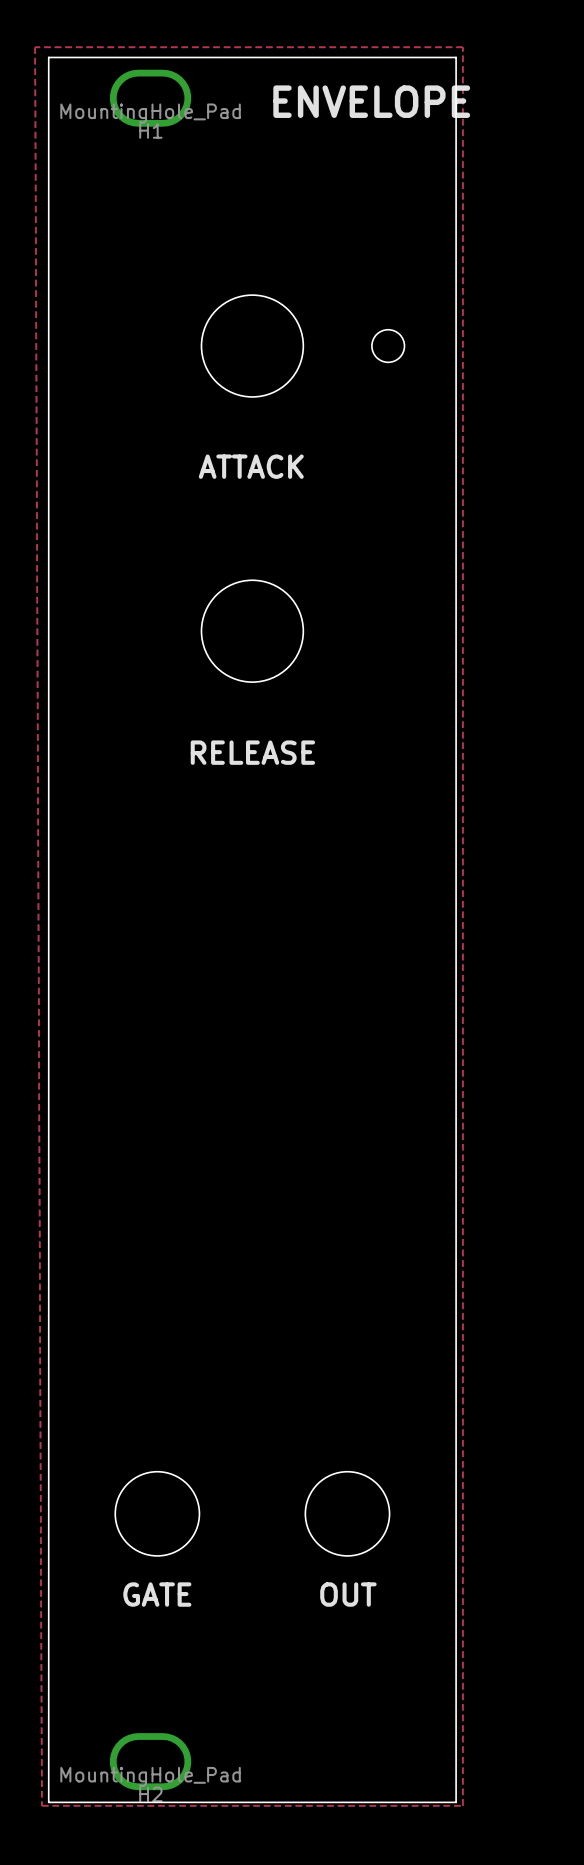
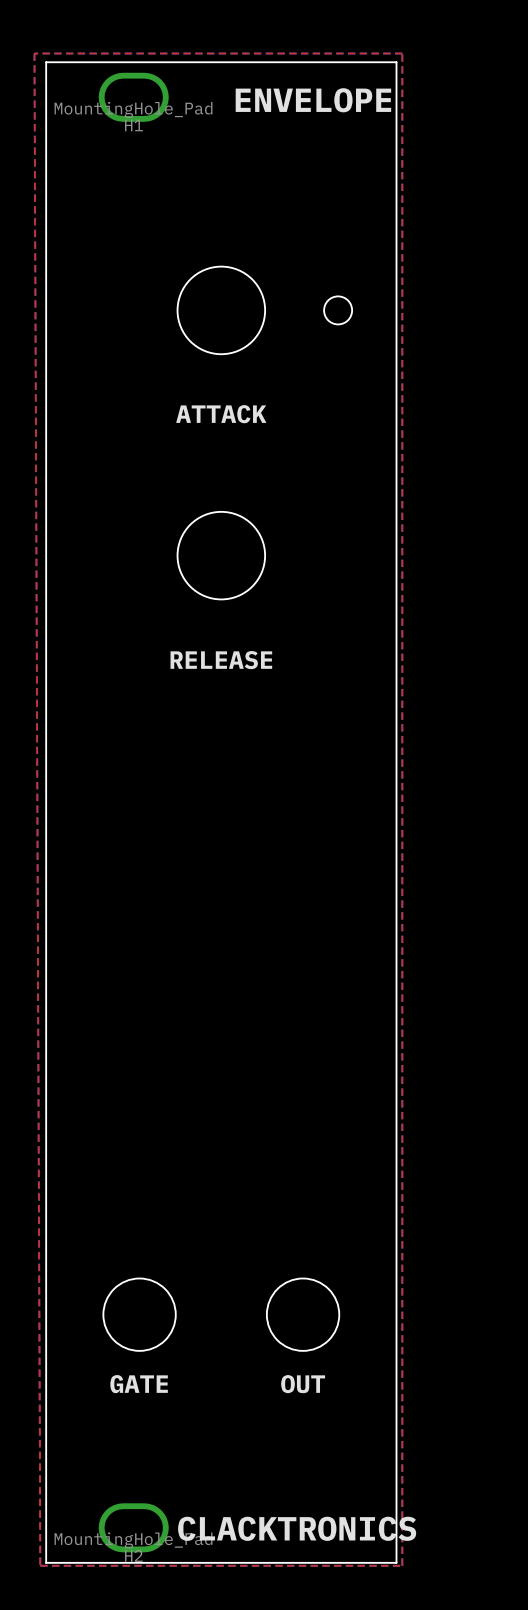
text: none -> CLACKTRONICS (297, 1528)

